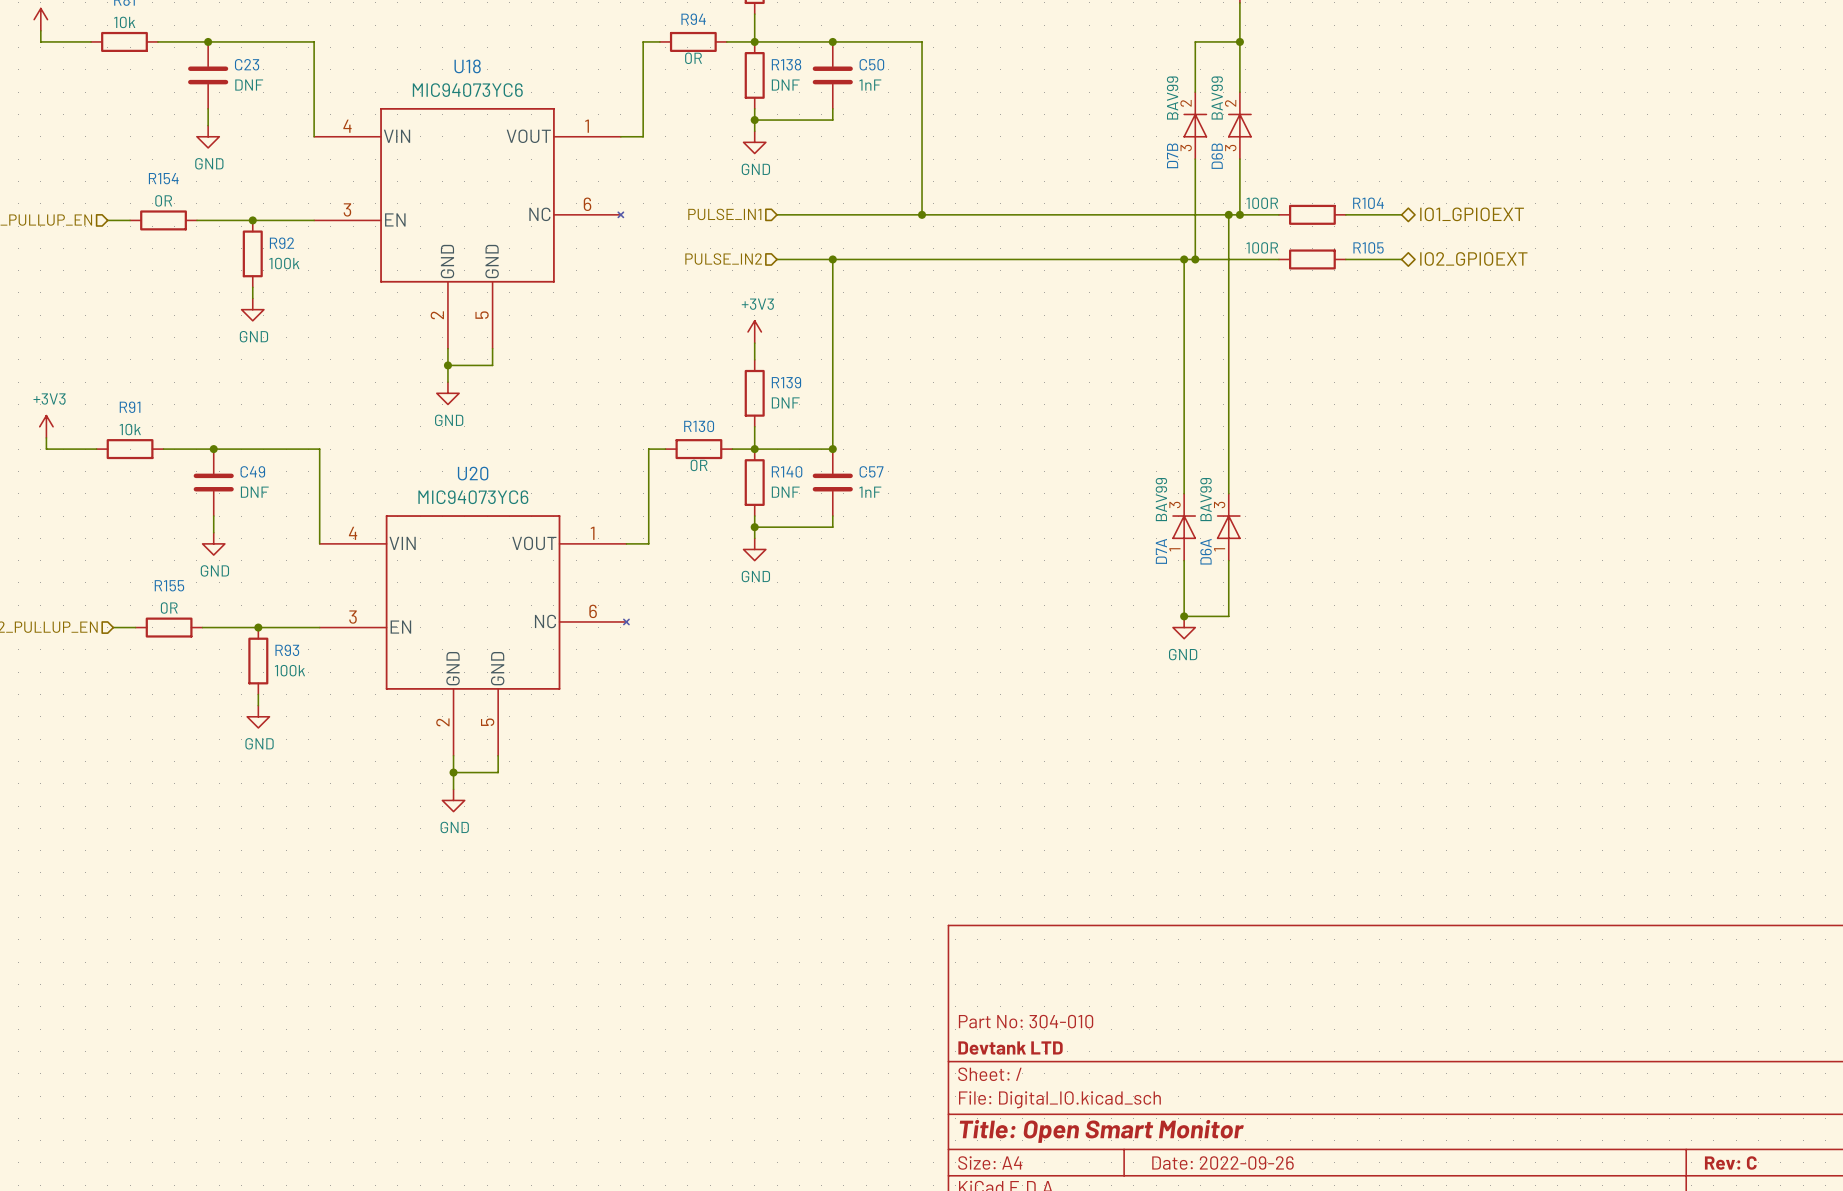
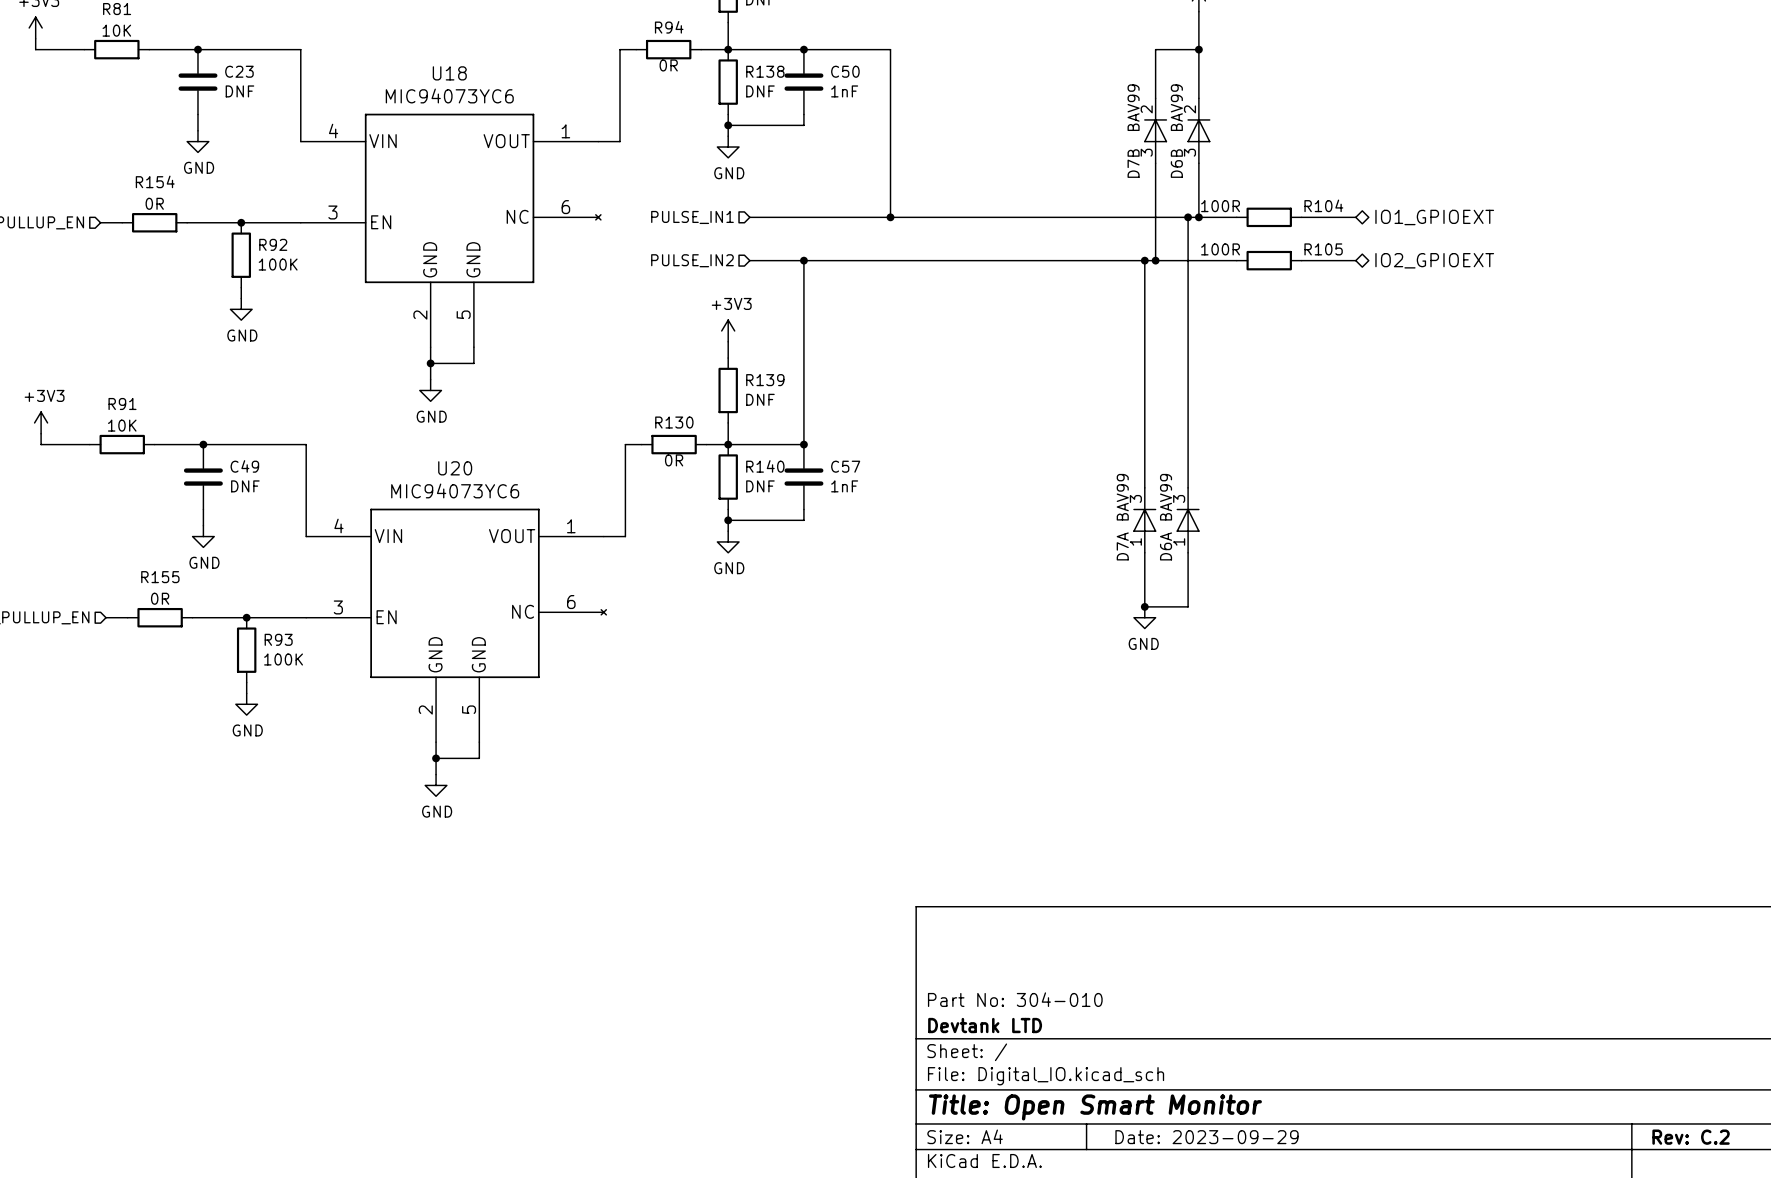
R81 value: 10k (124, 22) -> 10K (116, 30)
R92 value: 100k (284, 263) -> 100K (278, 264)
R91 value: 10k (130, 429) -> 10K (122, 425)
R93 value: 100k (289, 670) -> 100K (283, 659)
title block: Rev: C (1730, 1162) -> Rev: C.2 (1691, 1137)
title block: Date: 2022-09-26 (1222, 1163) -> Date: 2023-09-29 (1207, 1137)

